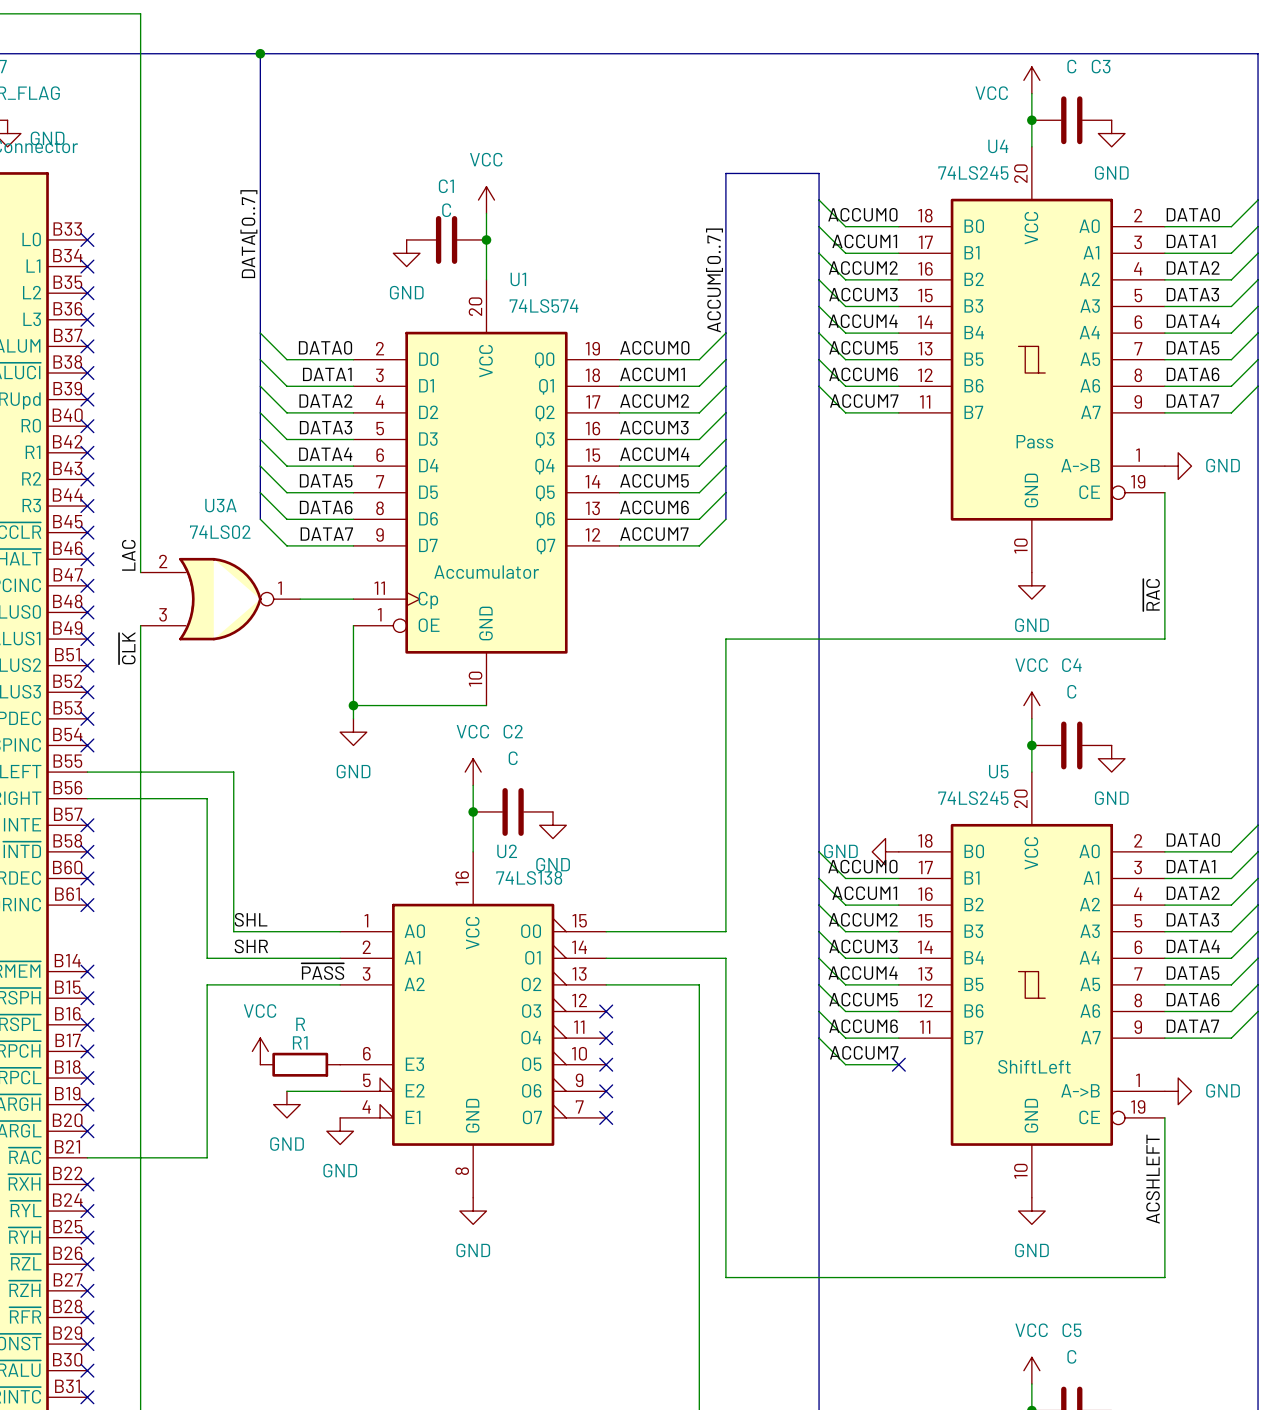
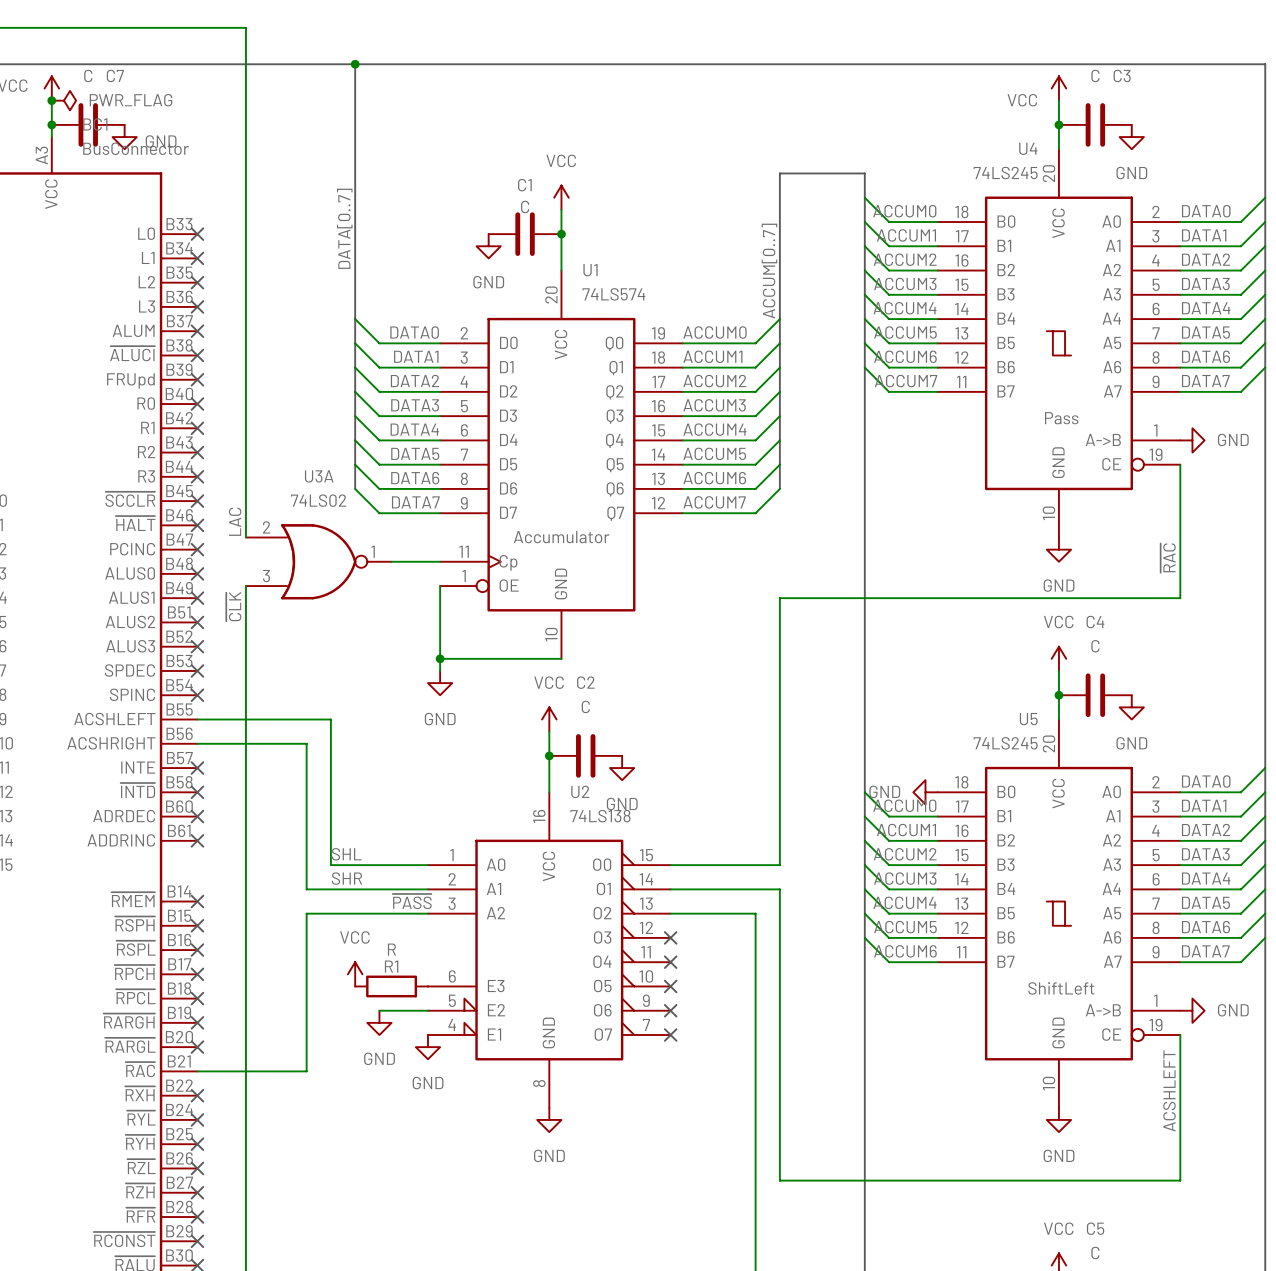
wire: (819, 1038) (845, 1064) (898, 1064) -> none
label: ACCUM7 (864, 1052) -> none
no-connect mark: (898, 1064) -> none

